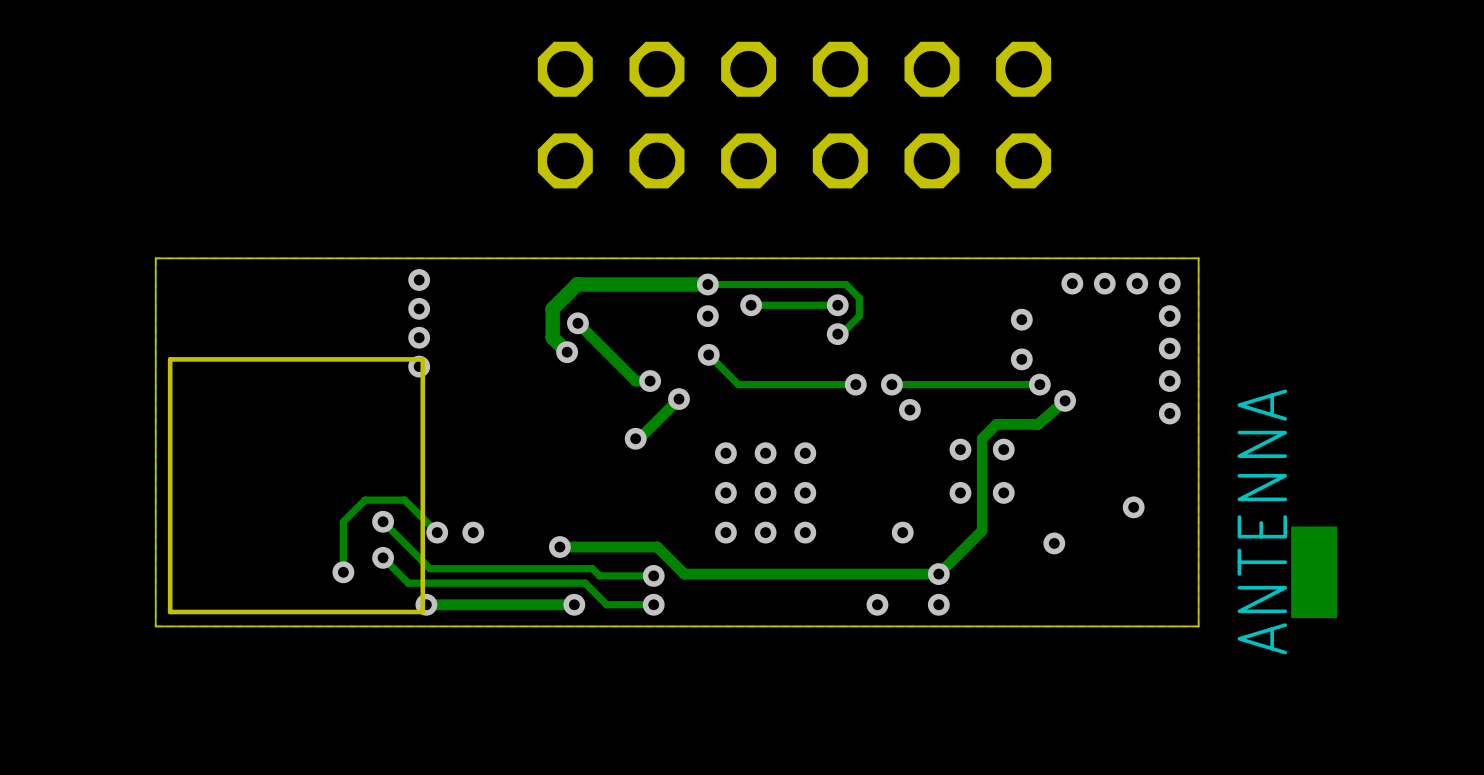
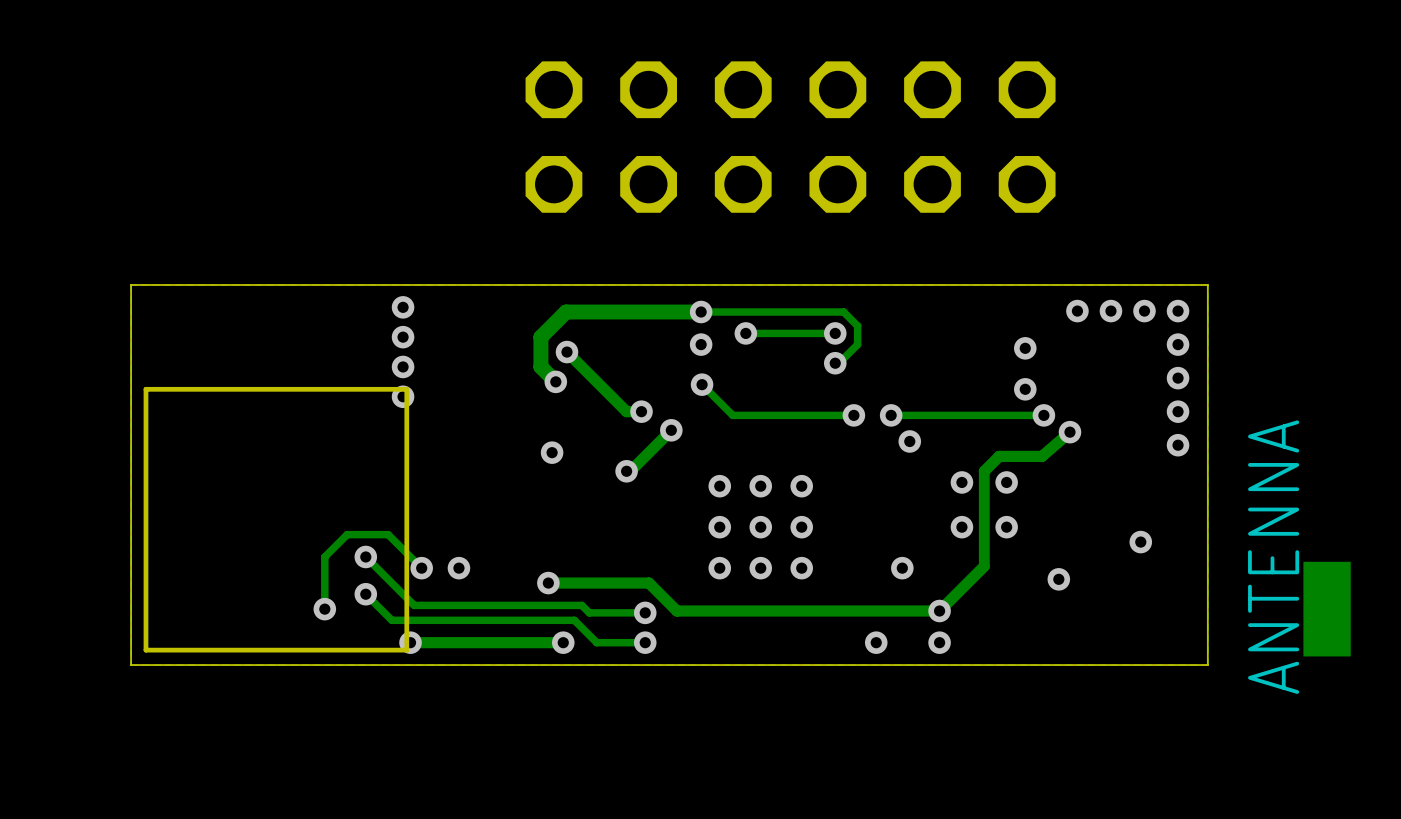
via: none -> (552, 452)

